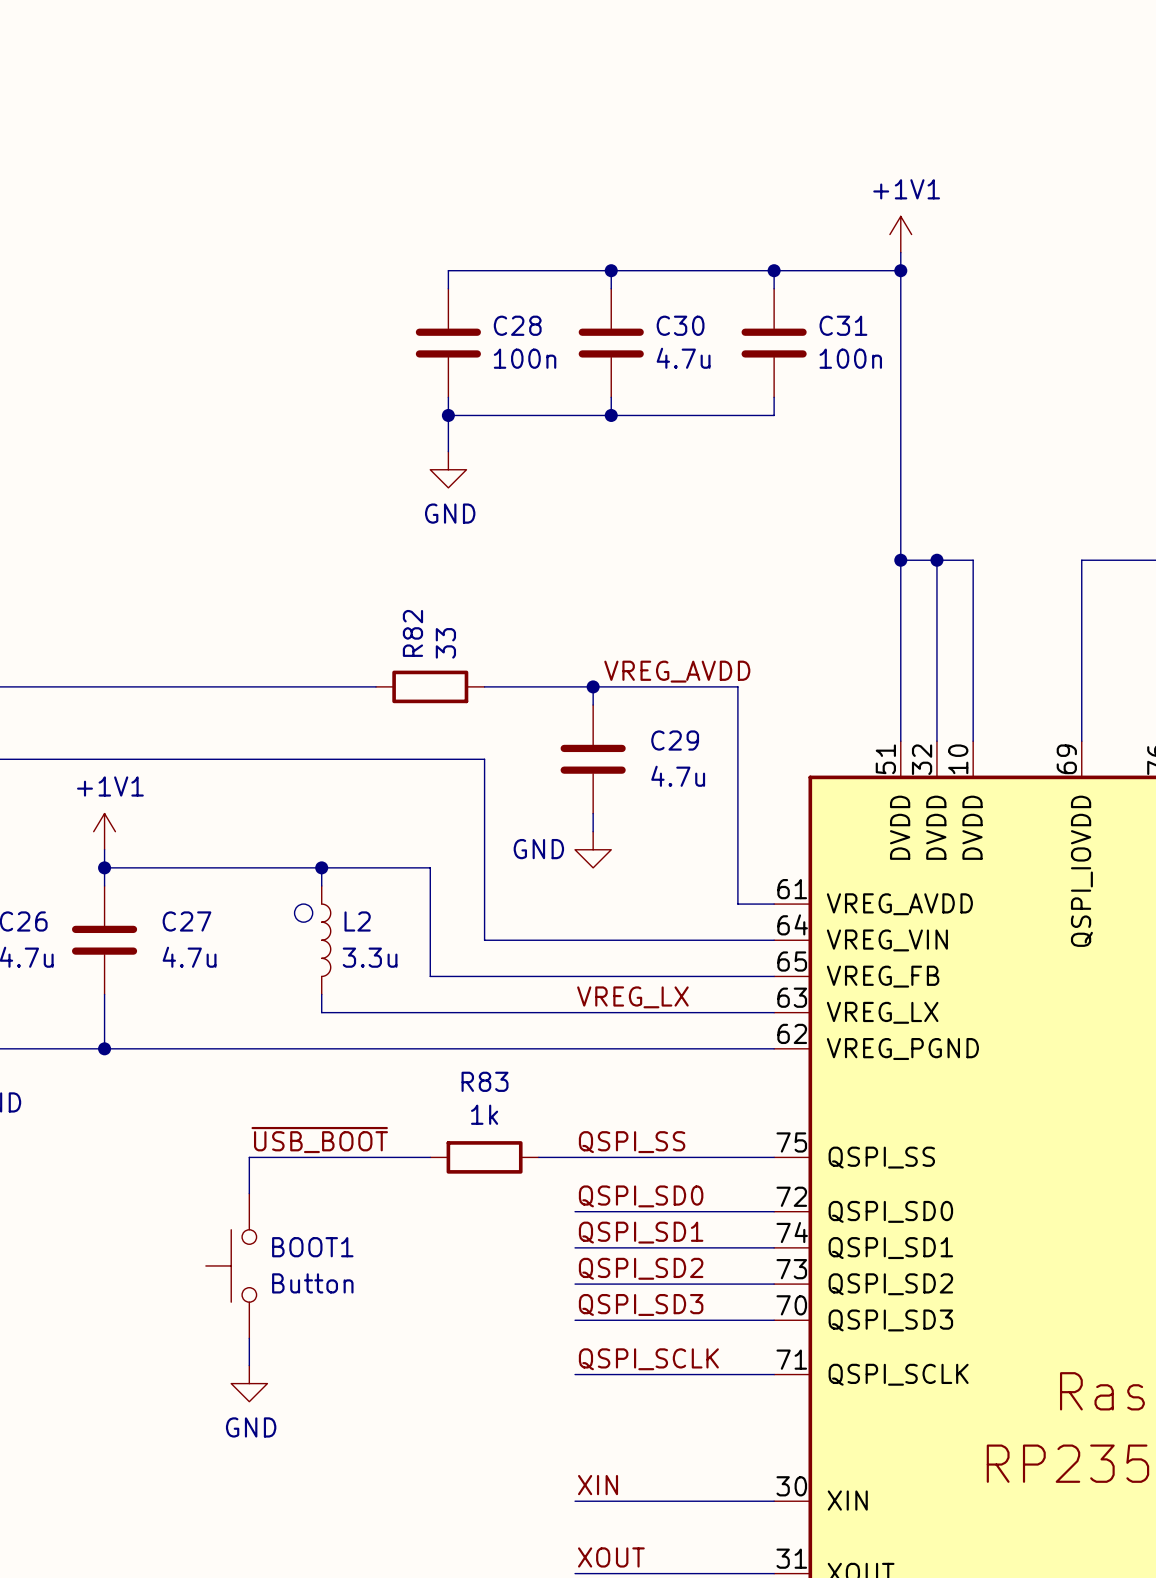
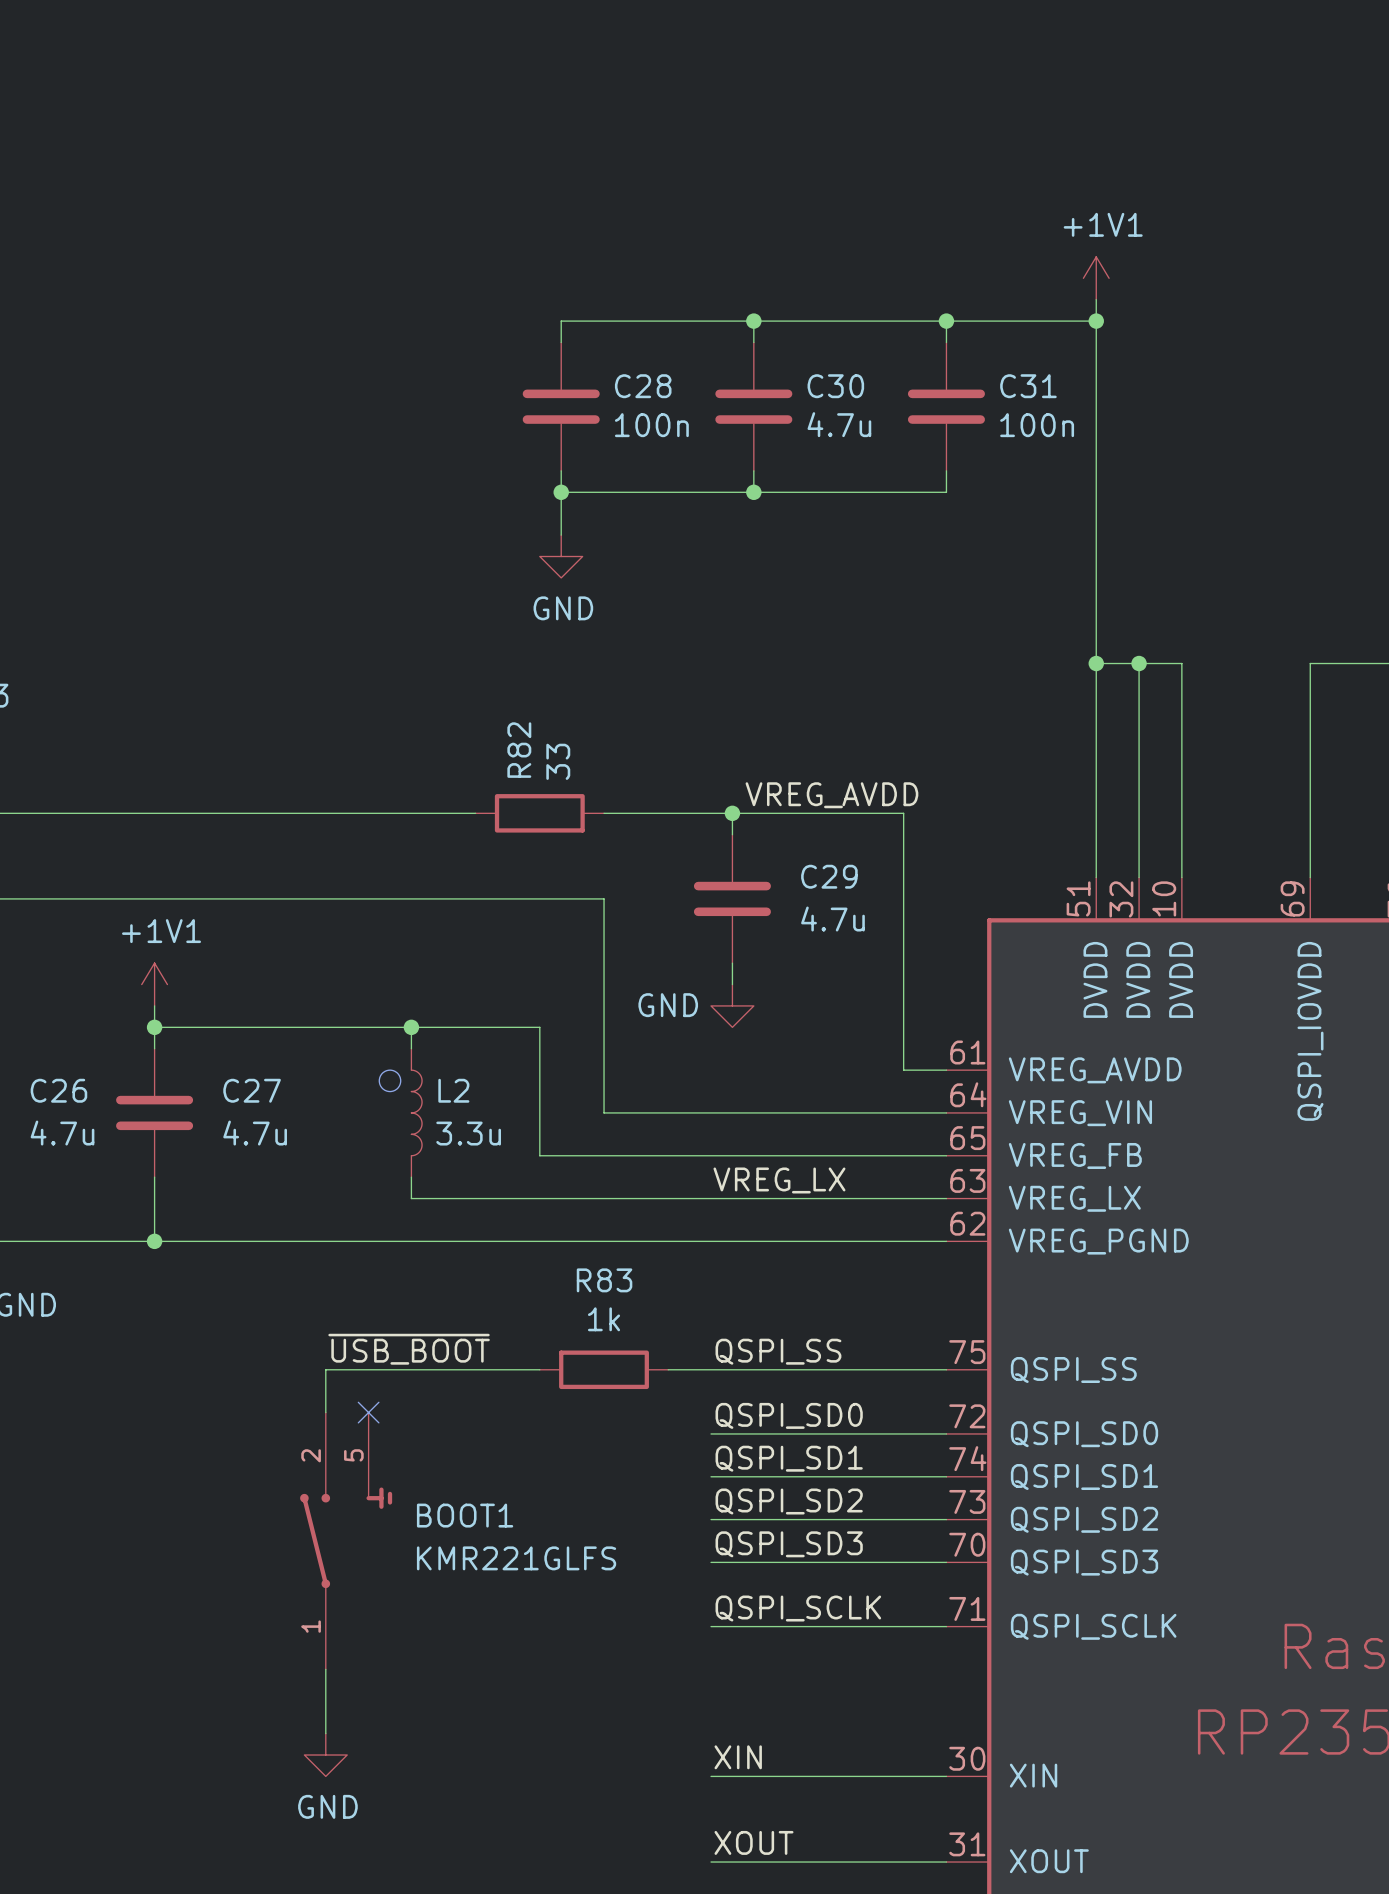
BOOT1 symbol: [205, 1193, 257, 1339] -> [300, 1412, 393, 1670]
no-connect mark: none -> (368, 1412)
BOOT1 value: Button (312, 1283) -> KMR221GLFS (516, 1558)
power symbol position: GND (249, 1383) -> GND (325, 1755)
wire: none -> (325, 1669) (325, 1733)

